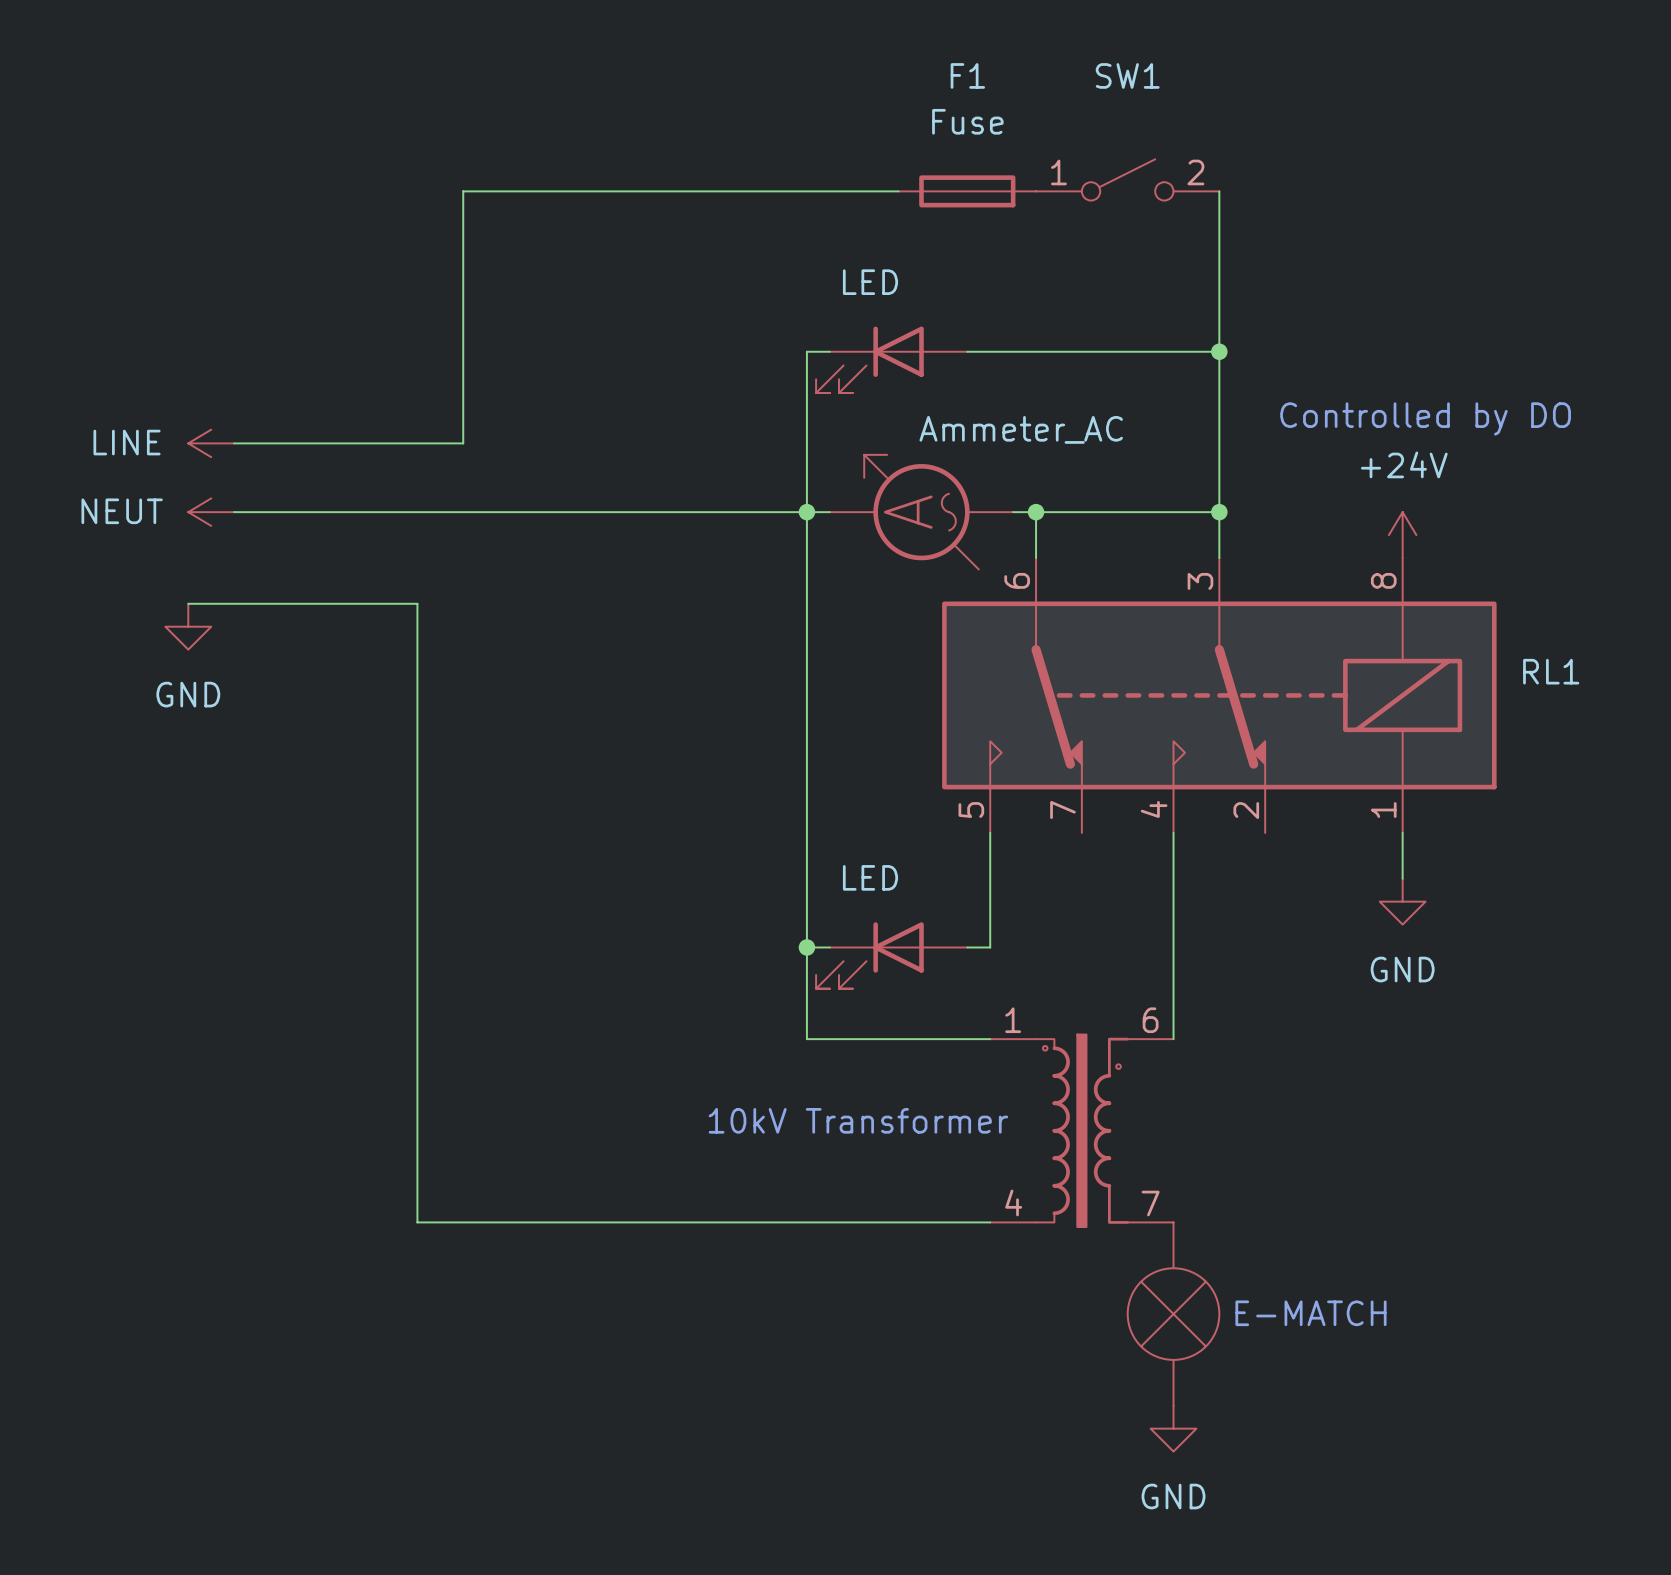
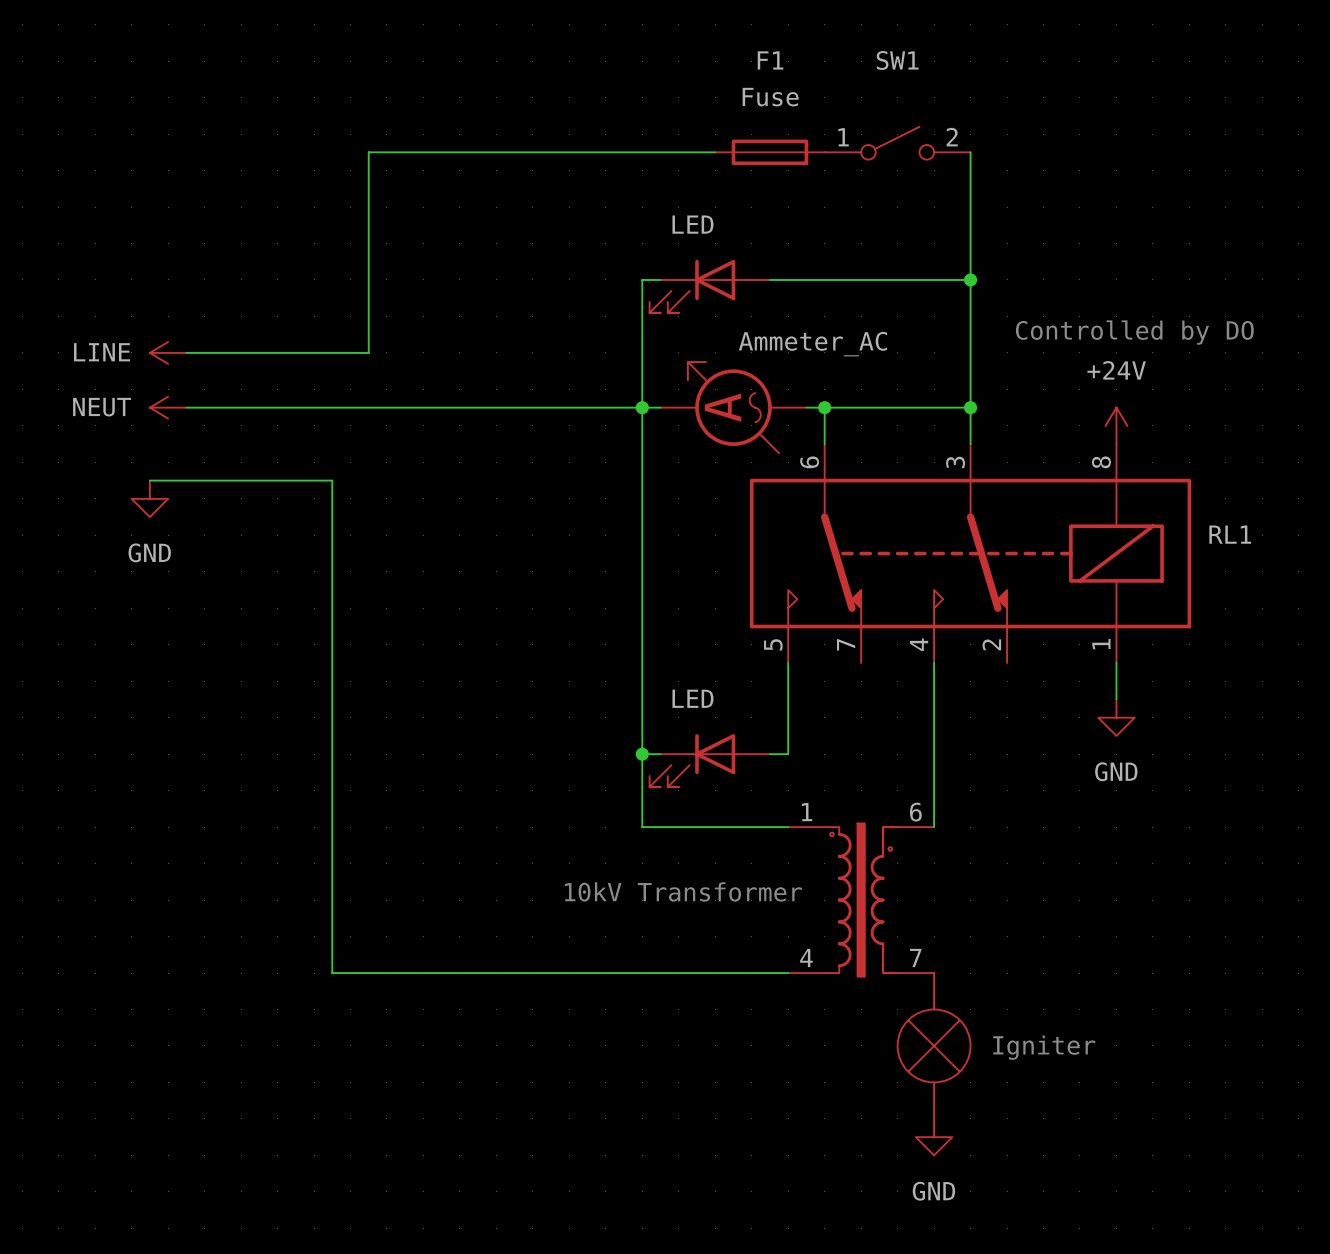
text: E-MATCH (1311, 1313) -> Igniter (1044, 1047)

